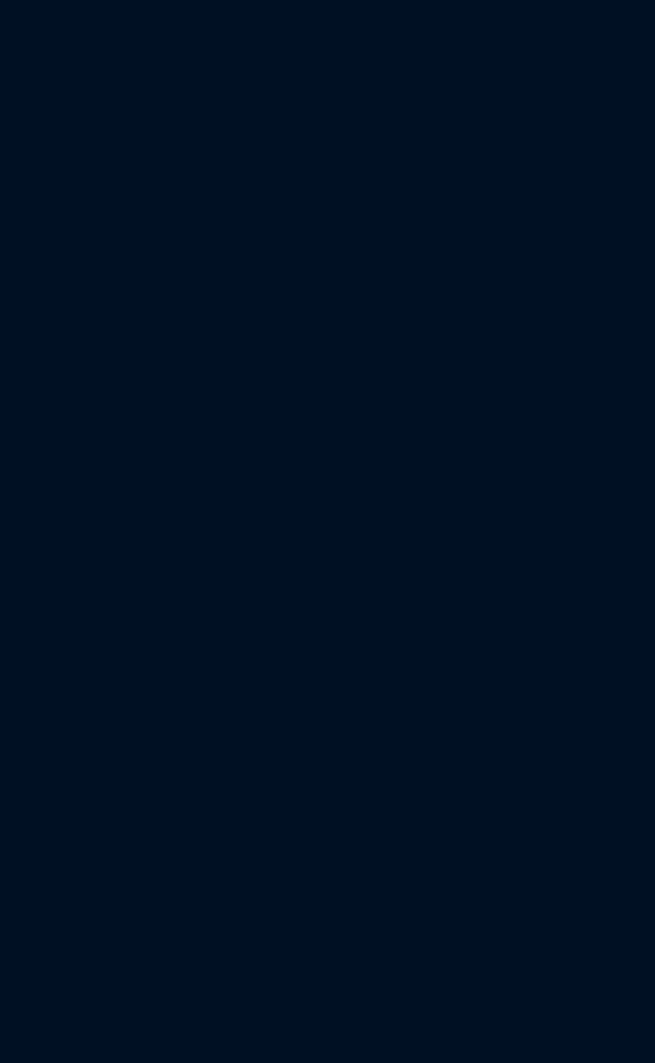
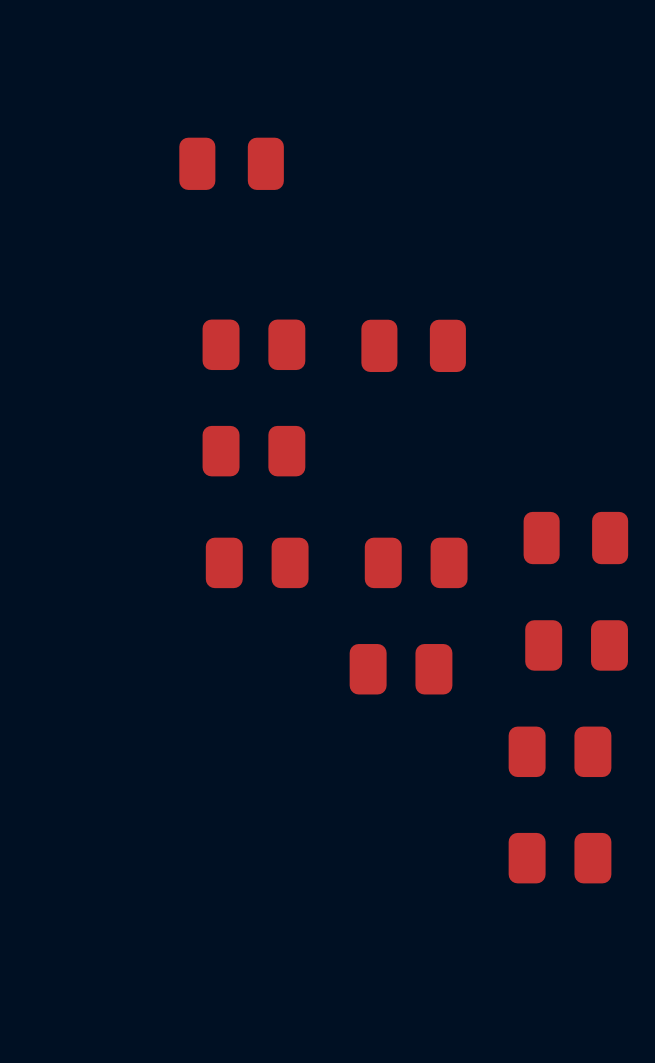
part: none -> (231, 163)
part: none -> (253, 344)
part: none -> (413, 345)
part: none -> (253, 451)
part: none -> (575, 538)
part: none -> (257, 562)
part: none -> (416, 562)
part: none -> (576, 645)
part: none -> (401, 669)
part: none -> (560, 751)
part: none -> (560, 858)

